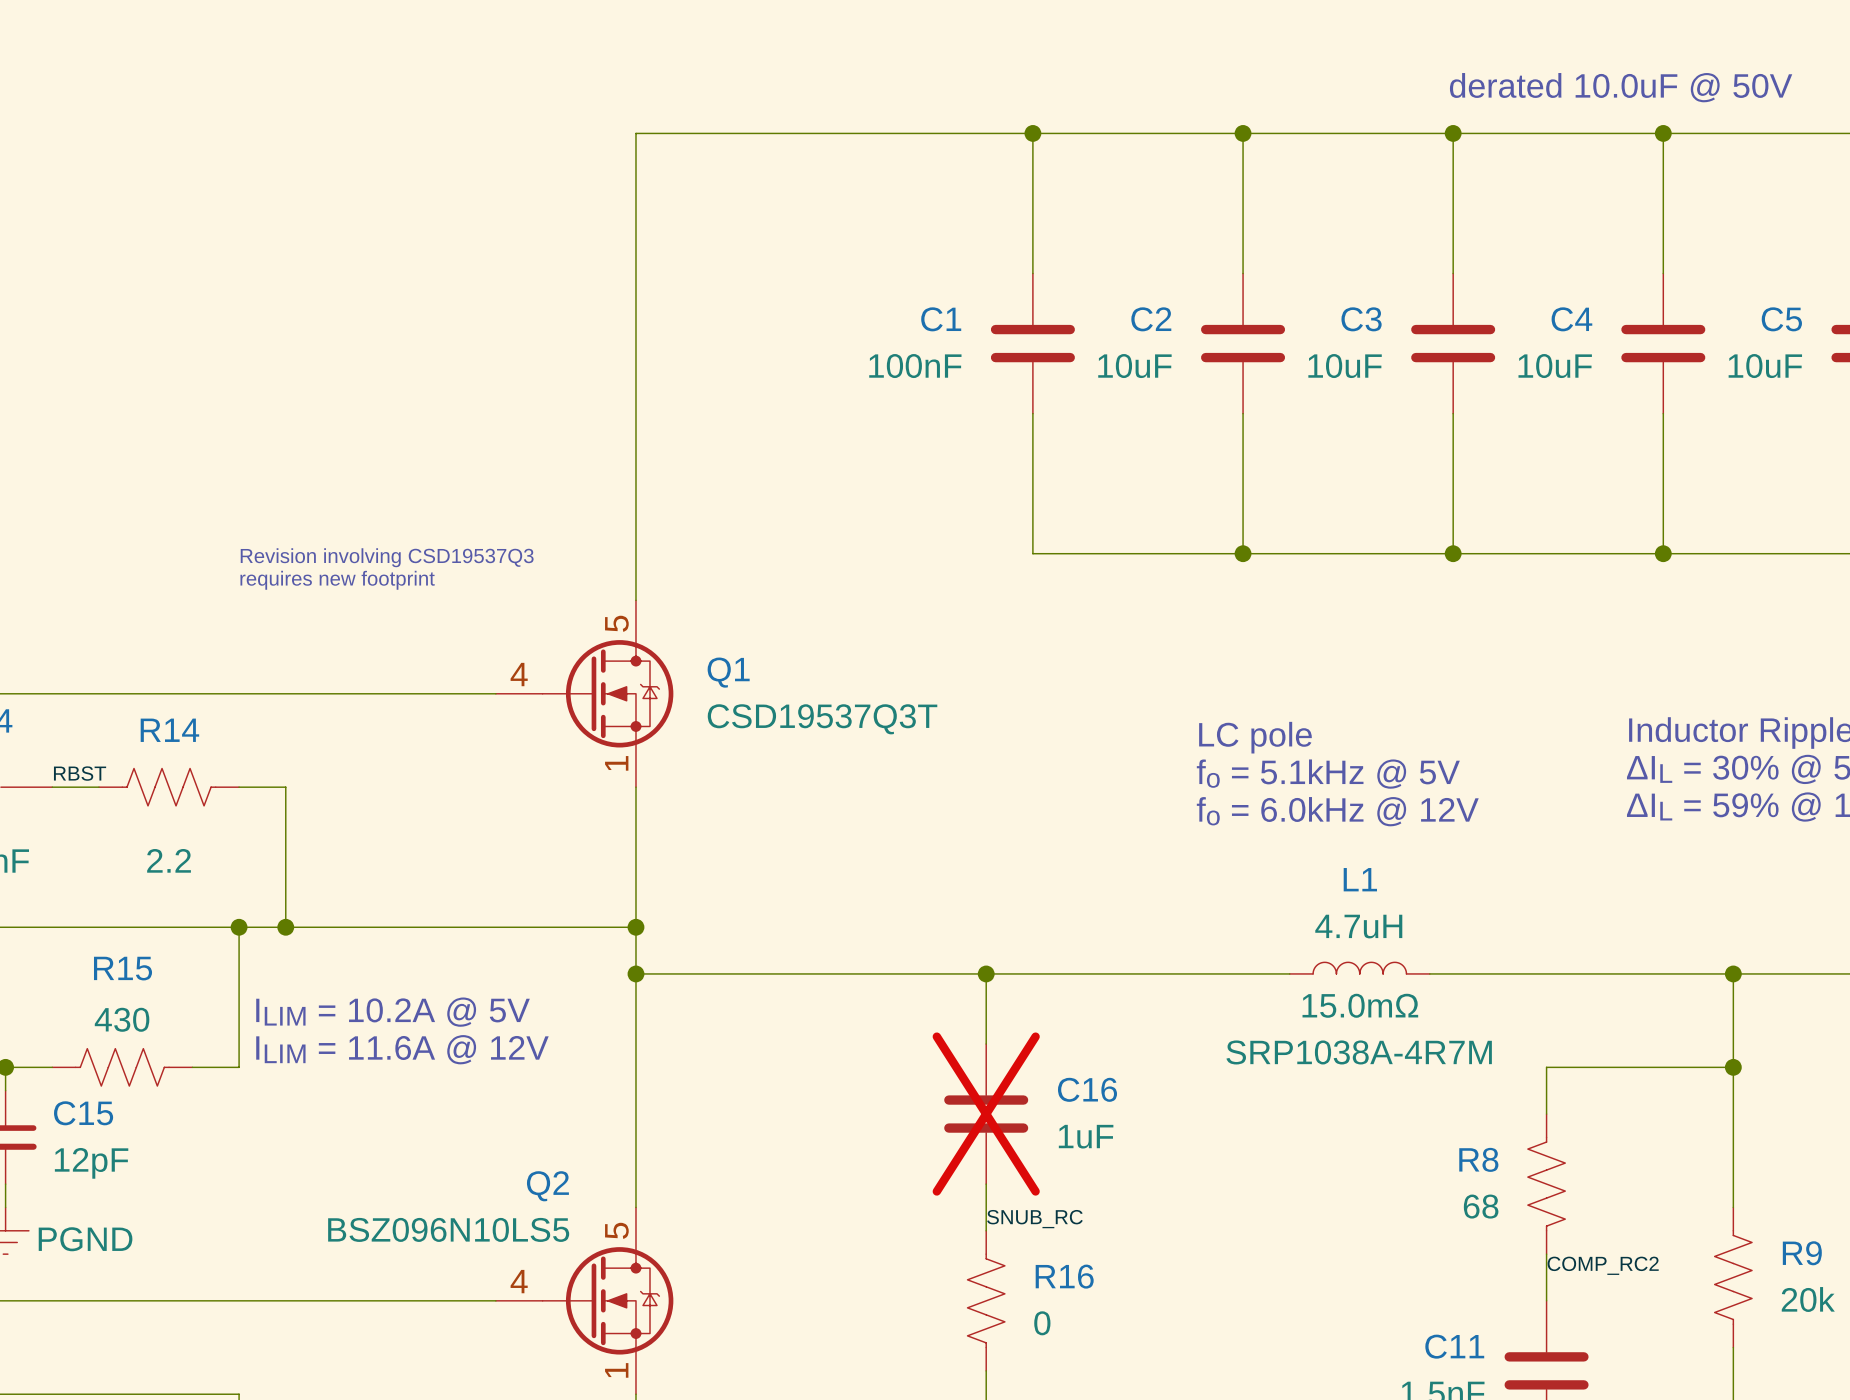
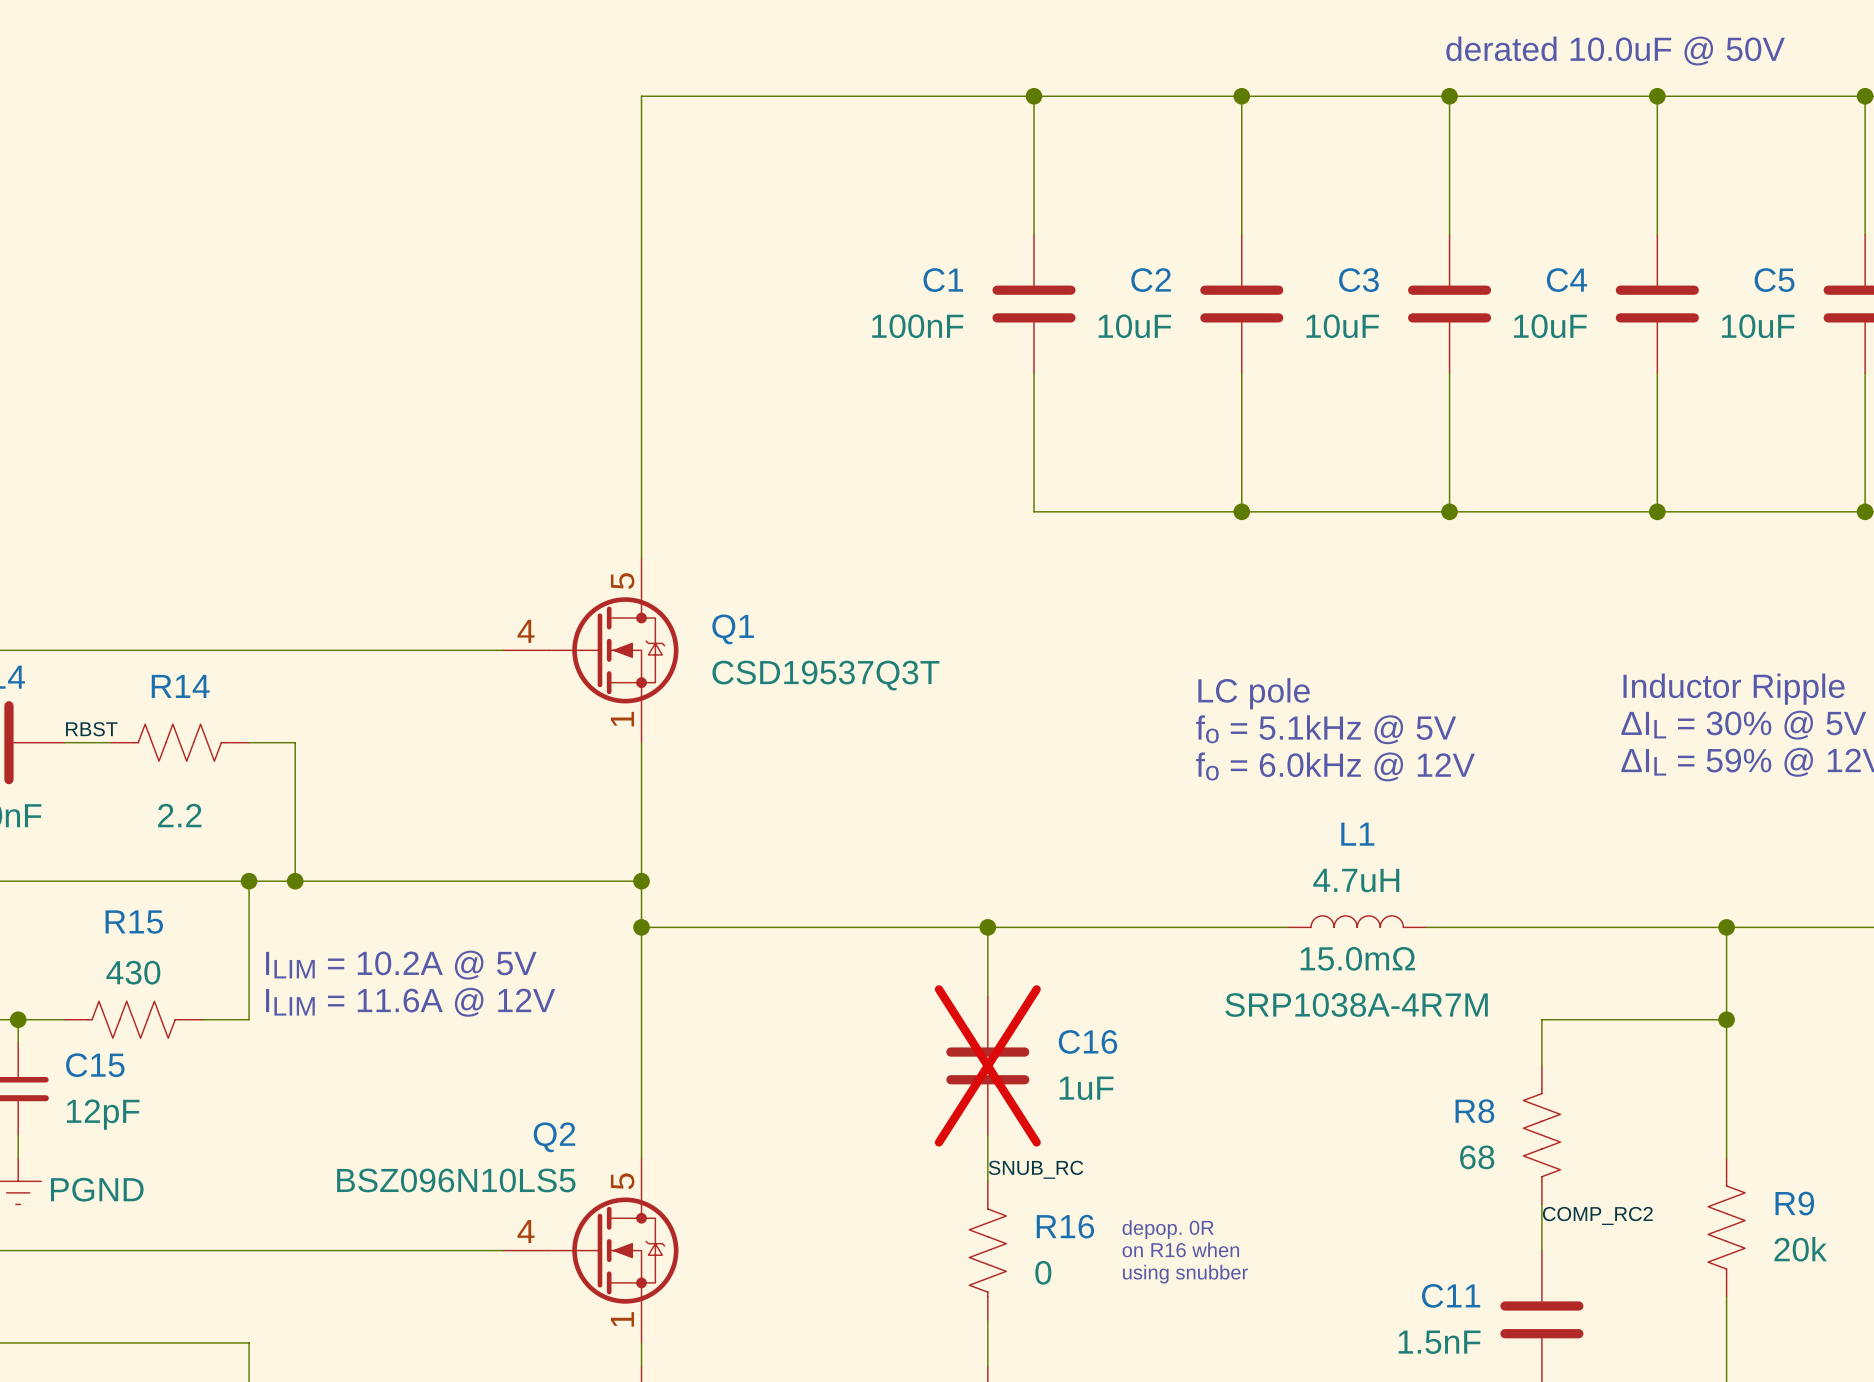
text: Revision involving CSD19537Q3 (387, 557) -> none
text: requires new footprint (337, 580) -> none
text: none -> depop. 0R (1168, 1229)
text: none -> on R16 when (1180, 1249)
text: none -> using snubber (1185, 1274)

